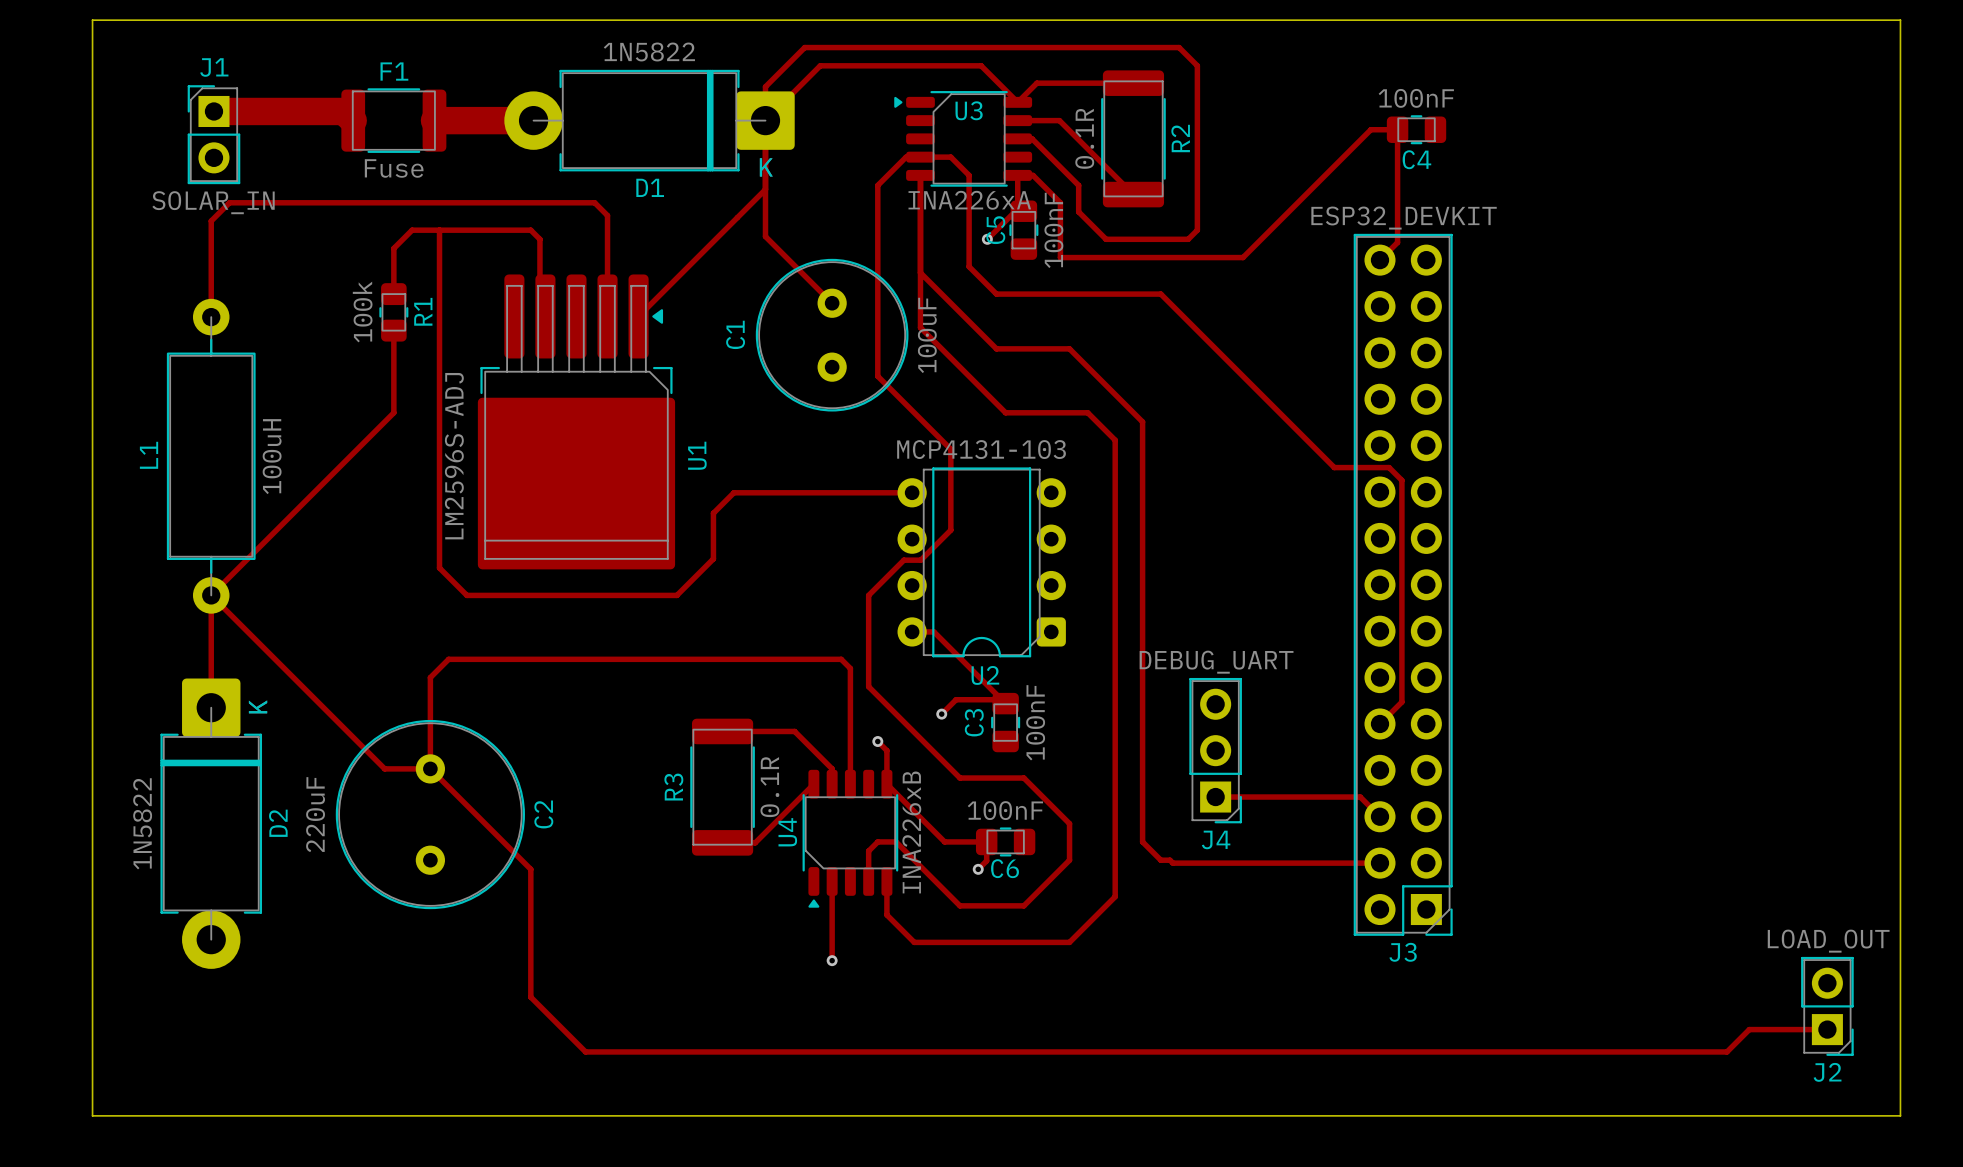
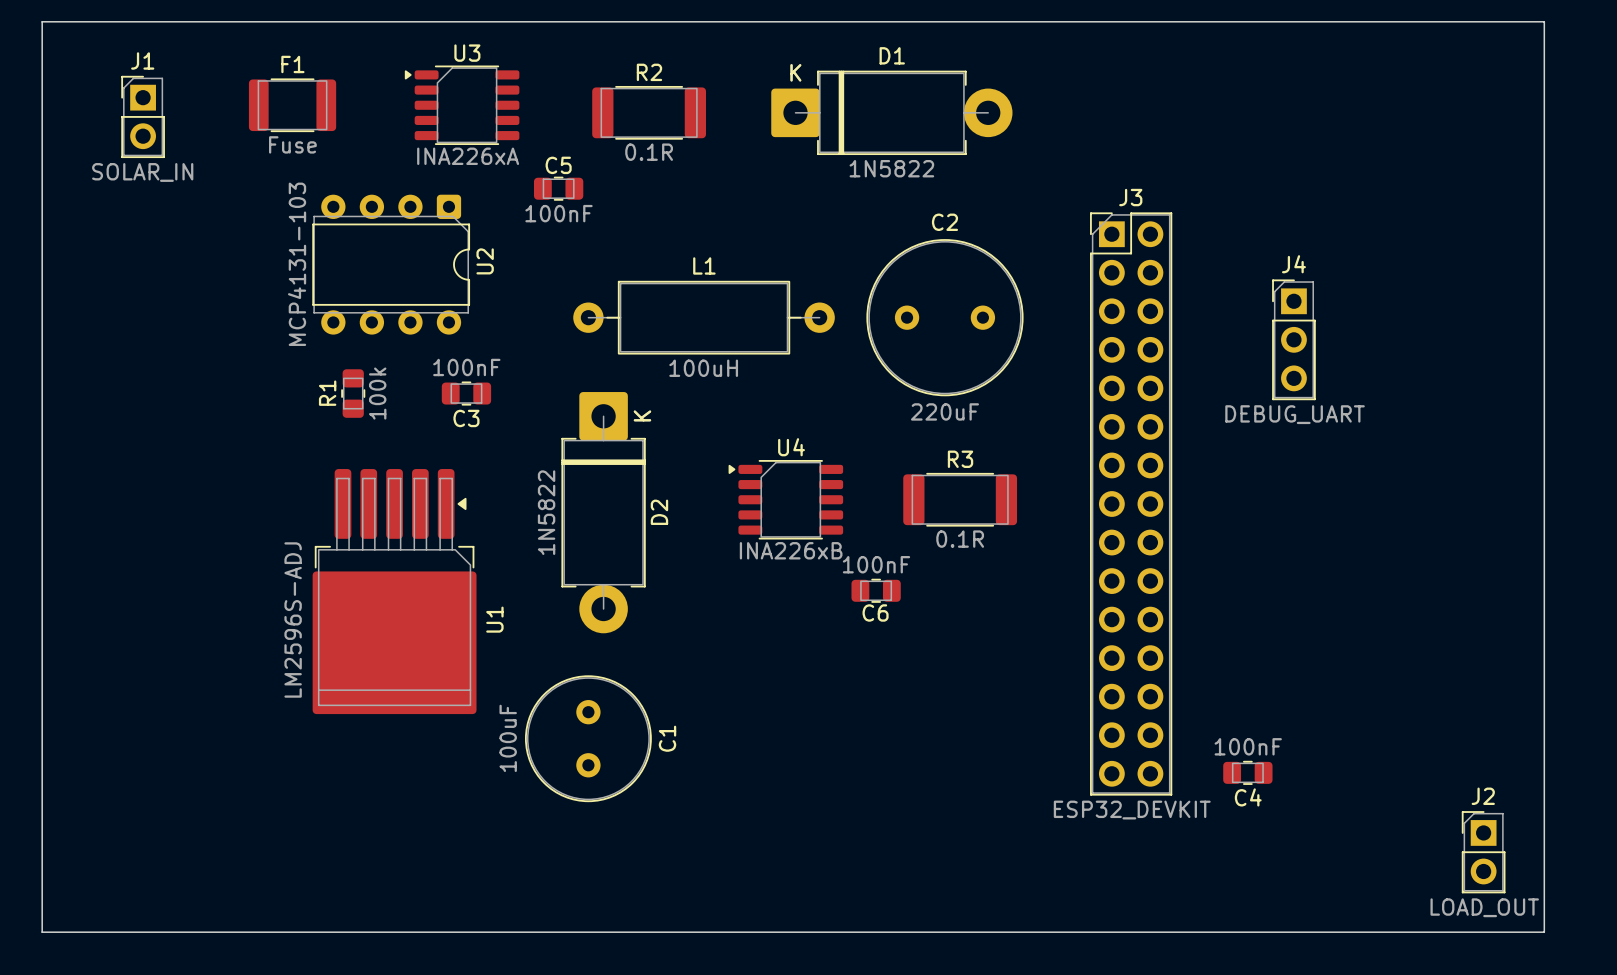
track: (1133, 83) (1036, 83) (1017, 102) (981, 65) (820, 65) (759, 127) -> none
U3 name position: U3 (969, 110) -> U3 (467, 53)
track: (213, 111) (344, 111) (353, 120) -> none
track: (434, 120) (533, 120) -> none
D1 rotation: 0° (649, 120) -> 180° (891, 112)
D1 position: (649, 120) -> (891, 112)
track: (1017, 120) (1059, 120) (1133, 194) -> none
C4 position: (1416, 129) -> (1247, 772)
U3 position: (963, 138) -> (462, 105)
track: (1017, 138) (1032, 138) (1078, 185) (1078, 211) (1106, 239) (1188, 239) (1197, 230) (1197, 65) (1179, 47) (804, 47) (765, 86) (765, 236) (832, 303) -> none
R2 value position: 0.1R (1084, 138) -> 0.1R (649, 152)
R2 rotation: 0° (1133, 138) -> 90° clockwise (649, 112)
R2 position: (1133, 138) -> (649, 112)
R2 name position: R2 (1180, 138) -> R2 (649, 72)
track: (920, 175) (920, 327) (1005, 412) (1087, 412) (1115, 440) (1115, 896) (1069, 942) (914, 942) (886, 915) (886, 881) -> none
track: (765, 189) (638, 316) -> none
track: (439, 230) (439, 568) (466, 595) (676, 595) (713, 558) (713, 513) (733, 492) (912, 492) -> none
C5 rotation: 0° (1023, 230) -> 90° clockwise (558, 188)
C5 position: (1023, 230) -> (558, 188)
track: (987, 239) (1015, 211) (1023, 211) (1017, 205) (1017, 175) (1033, 175) (1060, 202) (1060, 257) (1243, 257) (1370, 129) (1397, 129) (1397, 242) (1379, 260) -> none
via: (987, 239) -> none
track: (920, 272) (996, 348) (1069, 348) (1142, 421) (1142, 841) (1160, 860) (1169, 860) (1172, 863) (1379, 863) -> none
track: (393, 294) (393, 248) (412, 230) (530, 230) (539, 239) (539, 310) (545, 316) -> none
R1 name position: R1 (423, 311) -> R1 (327, 393)
R1 value position: 100k (362, 312) -> 100k (377, 393)
R1 position: (393, 312) -> (353, 393)
track: (607, 316) (607, 215) (594, 202) (229, 202) (211, 221) (211, 317) -> none
track: (393, 330) (393, 412) (211, 595) -> none
C1 name position: C1 (735, 334) -> C1 (667, 738)
C1 position: (832, 335) -> (588, 738)
C1 value position: 100uF (927, 335) -> 100uF (508, 738)
U1 position: (576, 421) -> (394, 591)
L1 rotation: 0° (211, 456) -> 90° clockwise (704, 317)
L1 position: (211, 456) -> (704, 317)
U2 rotation: 0° (981, 562) -> 90° counterclockwise (391, 264)
U2 position: (981, 562) -> (391, 264)
J3 rotation: 0° (1403, 584) -> 180° (1131, 504)
track: (211, 595) (384, 768) (430, 768) -> none
track: (211, 595) (211, 707) -> none
track: (912, 631) (933, 631) (1005, 703) -> none
track: (1001, 699) (956, 699) (941, 714) -> none
via: (941, 714) -> none
C3 name position: C3 (974, 722) -> C3 (466, 418)
C3 rotation: 0° (1005, 722) -> 90° clockwise (466, 393)
C3 position: (1005, 722) -> (466, 393)
C3 value position: 100nF (1035, 722) -> 100nF (466, 367)
track: (1379, 723) (1401, 702) (1401, 480) (1389, 467) (1334, 467) (1160, 294) (996, 294) (969, 266) (969, 175) (950, 157) (906, 157) (877, 185) (877, 376) (950, 449) (950, 530) (920, 560) (903, 560) (868, 595) (868, 686) (959, 778) (1023, 778) (1069, 823) (1069, 860) (1023, 905) (959, 905) (896, 841) (877, 841) (868, 851) (868, 881) -> none
track: (722, 731) (794, 731) (832, 768) (832, 784) -> none
track: (877, 741) (886, 750) (886, 784) (944, 841) (986, 841) (986, 860) (978, 869) -> none
via: (877, 741) -> none
J4 rotation: 0° (1215, 750) -> 180° (1293, 339)
J4 position: (1215, 750) -> (1293, 339)
track: (430, 768) (530, 869) (530, 997) (585, 1051) (1726, 1051) (1749, 1029) (1827, 1029) -> none
track: (430, 768) (430, 677) (448, 659) (841, 659) (850, 668) (850, 784) -> none
track: (813, 784) (755, 842) (722, 842) -> none
R3 rotation: 0° (722, 787) -> 90° clockwise (960, 499)
R3 position: (722, 787) -> (960, 499)
track: (1215, 797) (1360, 797) (1379, 816) -> none
C2 value position: 220uF (315, 814) -> 220uF (944, 411)
C2 rotation: 0° (430, 814) -> 90° clockwise (944, 317)
C2 position: (430, 814) -> (944, 317)
C2 name position: C2 (543, 814) -> C2 (944, 222)
D2 position: (211, 823) -> (603, 512)
U4 rotation: 0° (850, 838) -> 90° clockwise (785, 499)
U4 position: (850, 838) -> (785, 499)
C6 position: (1005, 841) -> (876, 590)
via: (978, 869) -> none
track: (832, 881) (832, 960) -> none
via: (832, 960) -> none
J2 rotation: 0° (1827, 1006) -> 180° (1483, 852)

